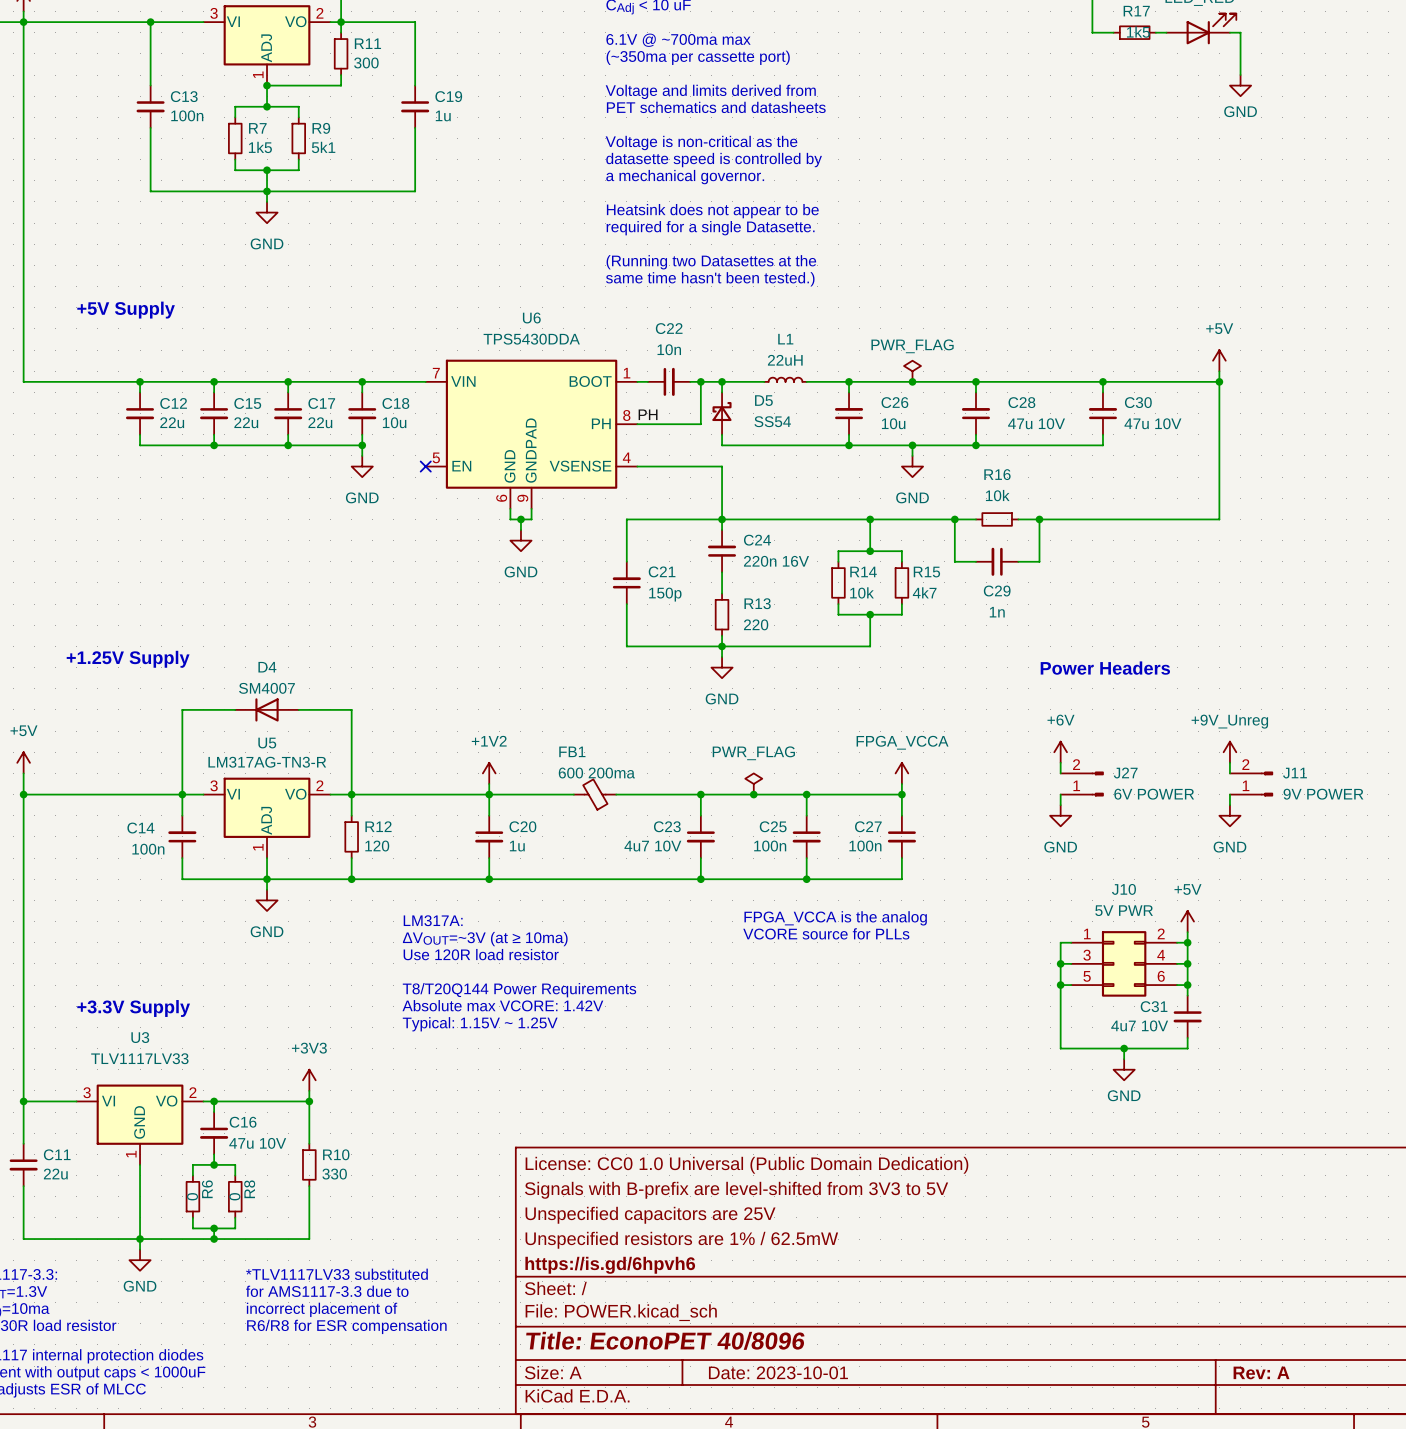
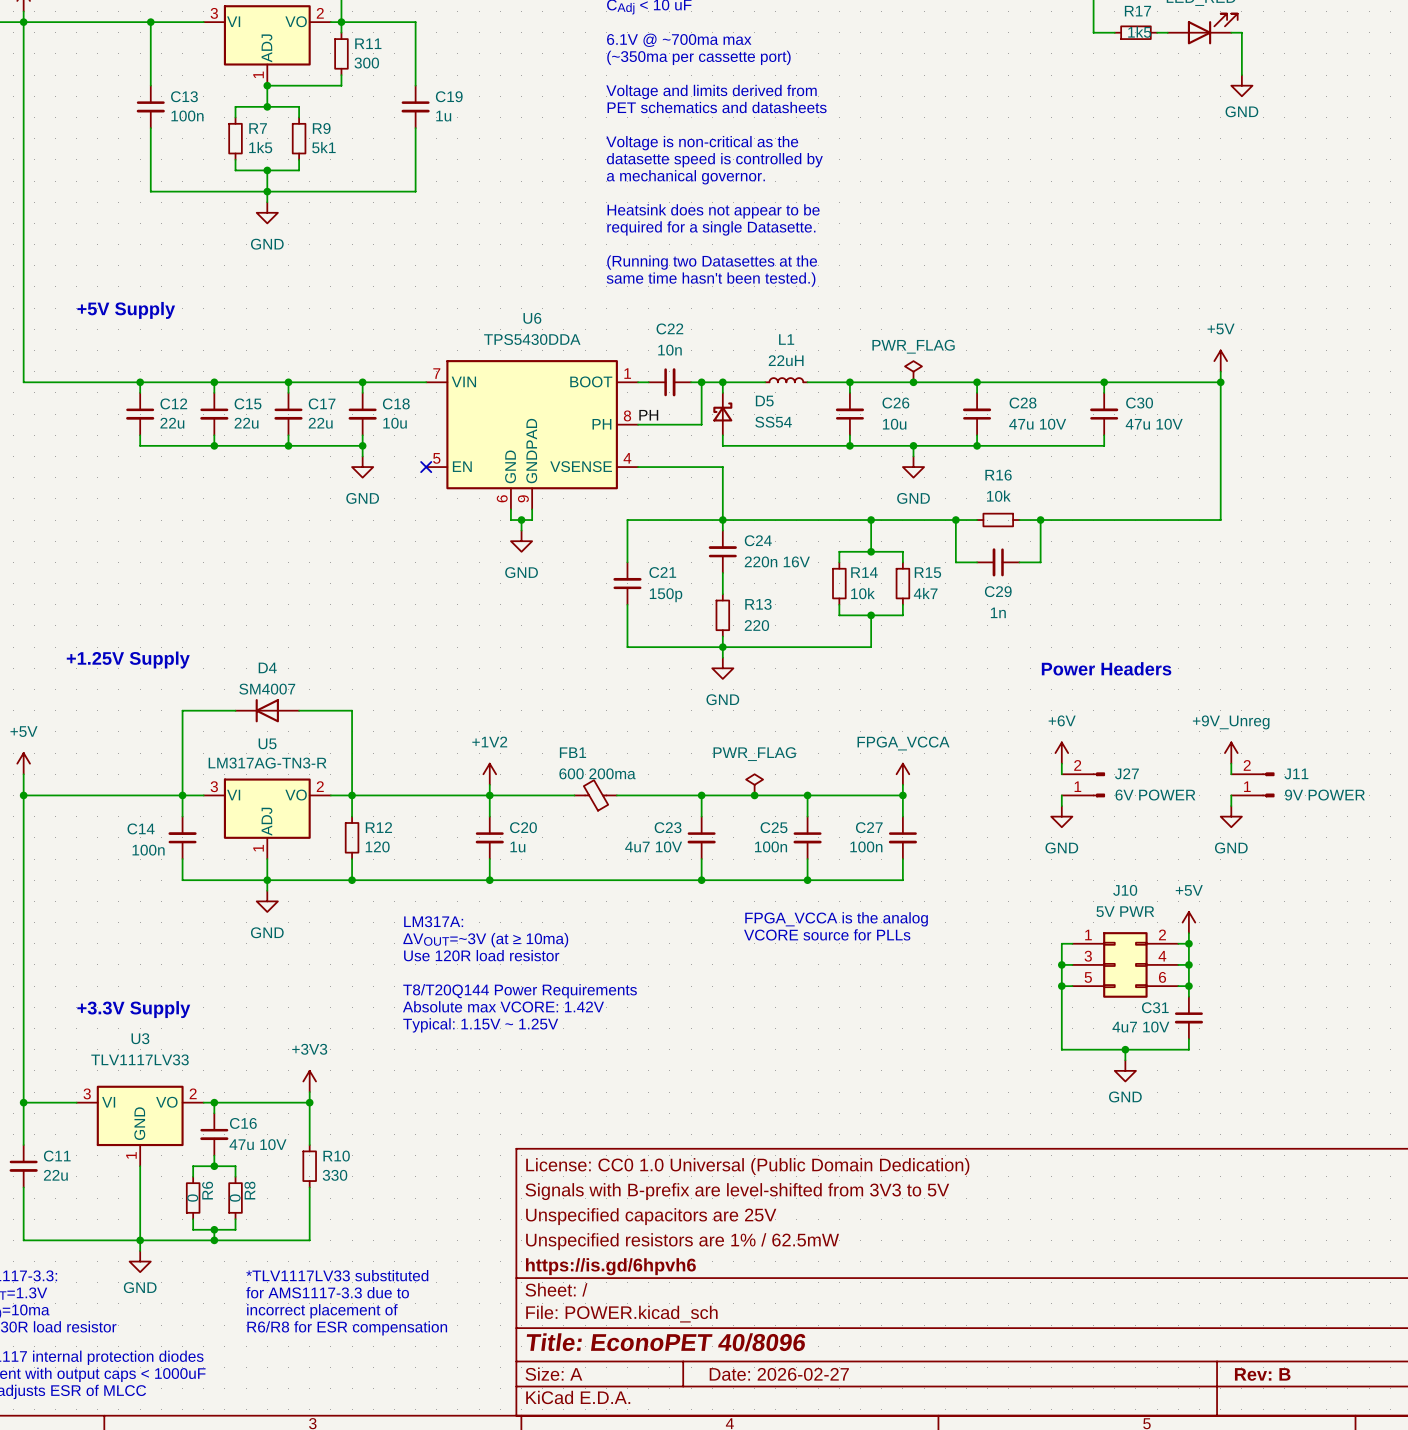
title block: Date: 2023-10-01 (778, 1372) -> Date: 2026-02-27 (779, 1374)
title block: Rev: A (1261, 1372) -> Rev: B (1262, 1374)

